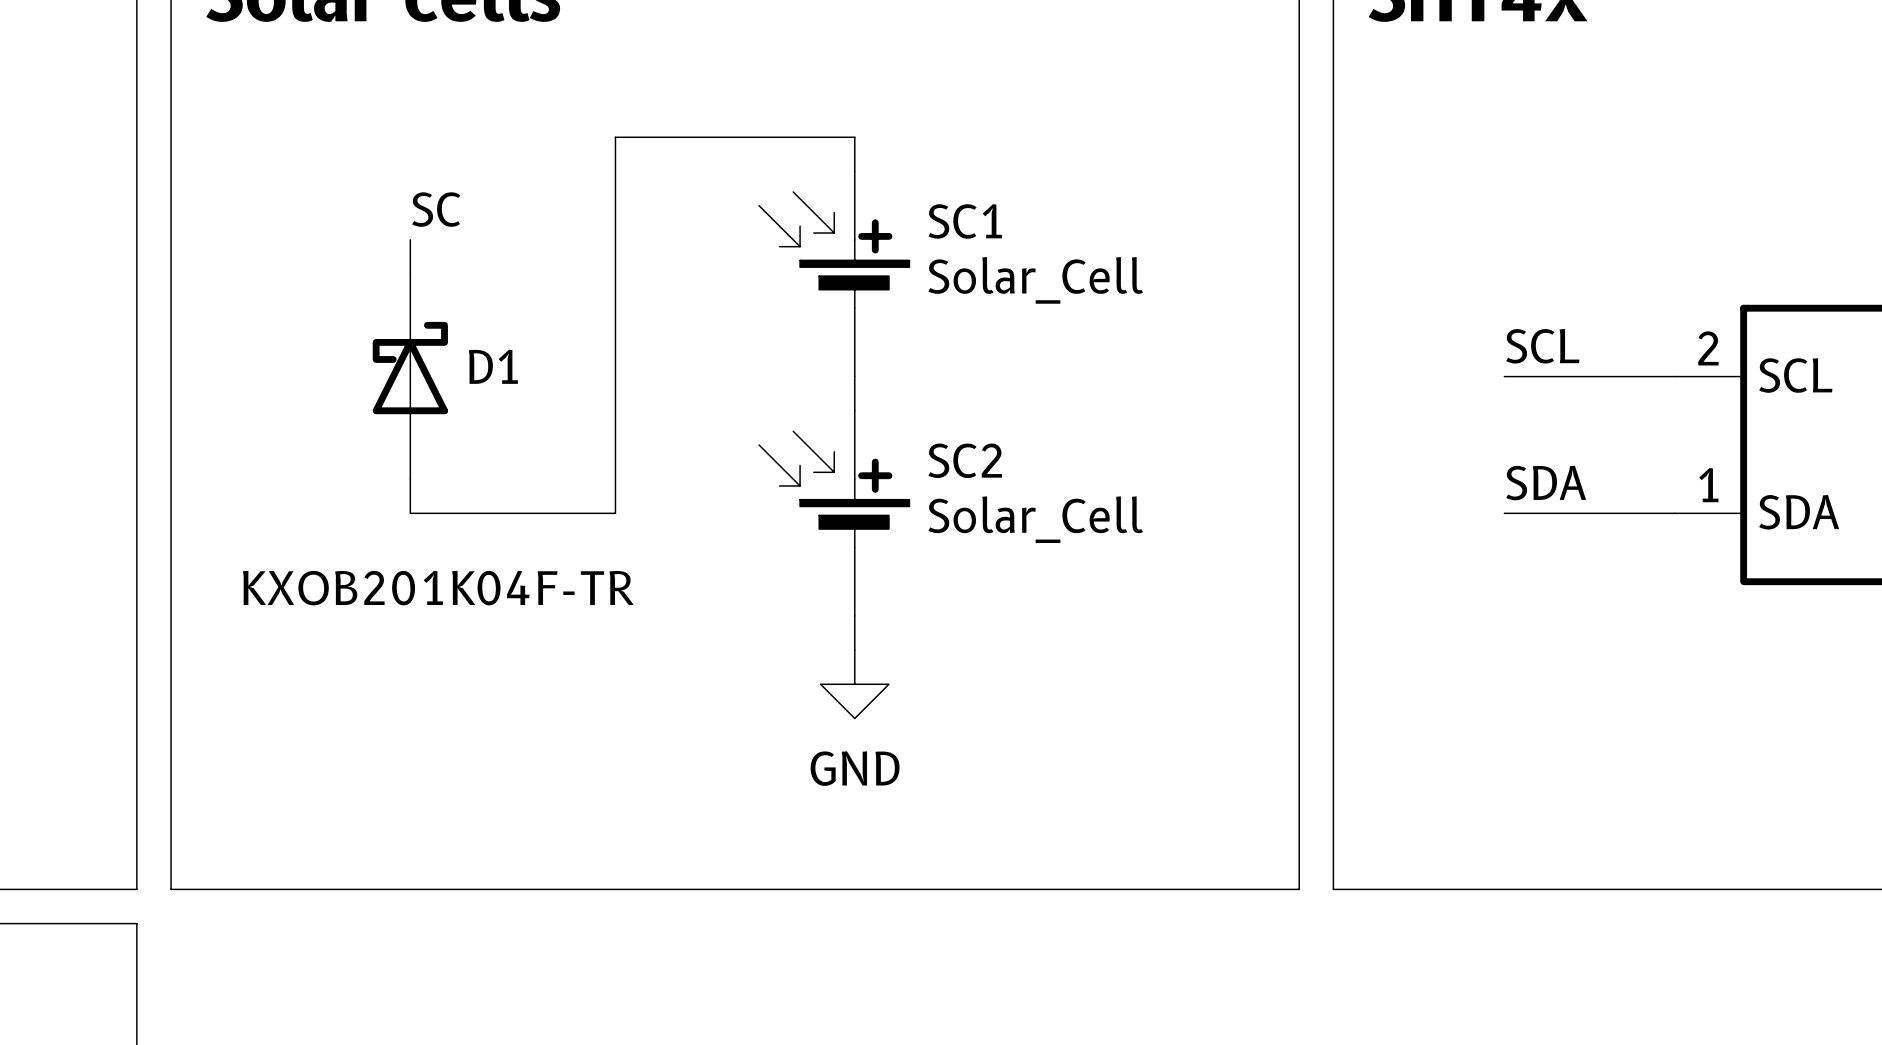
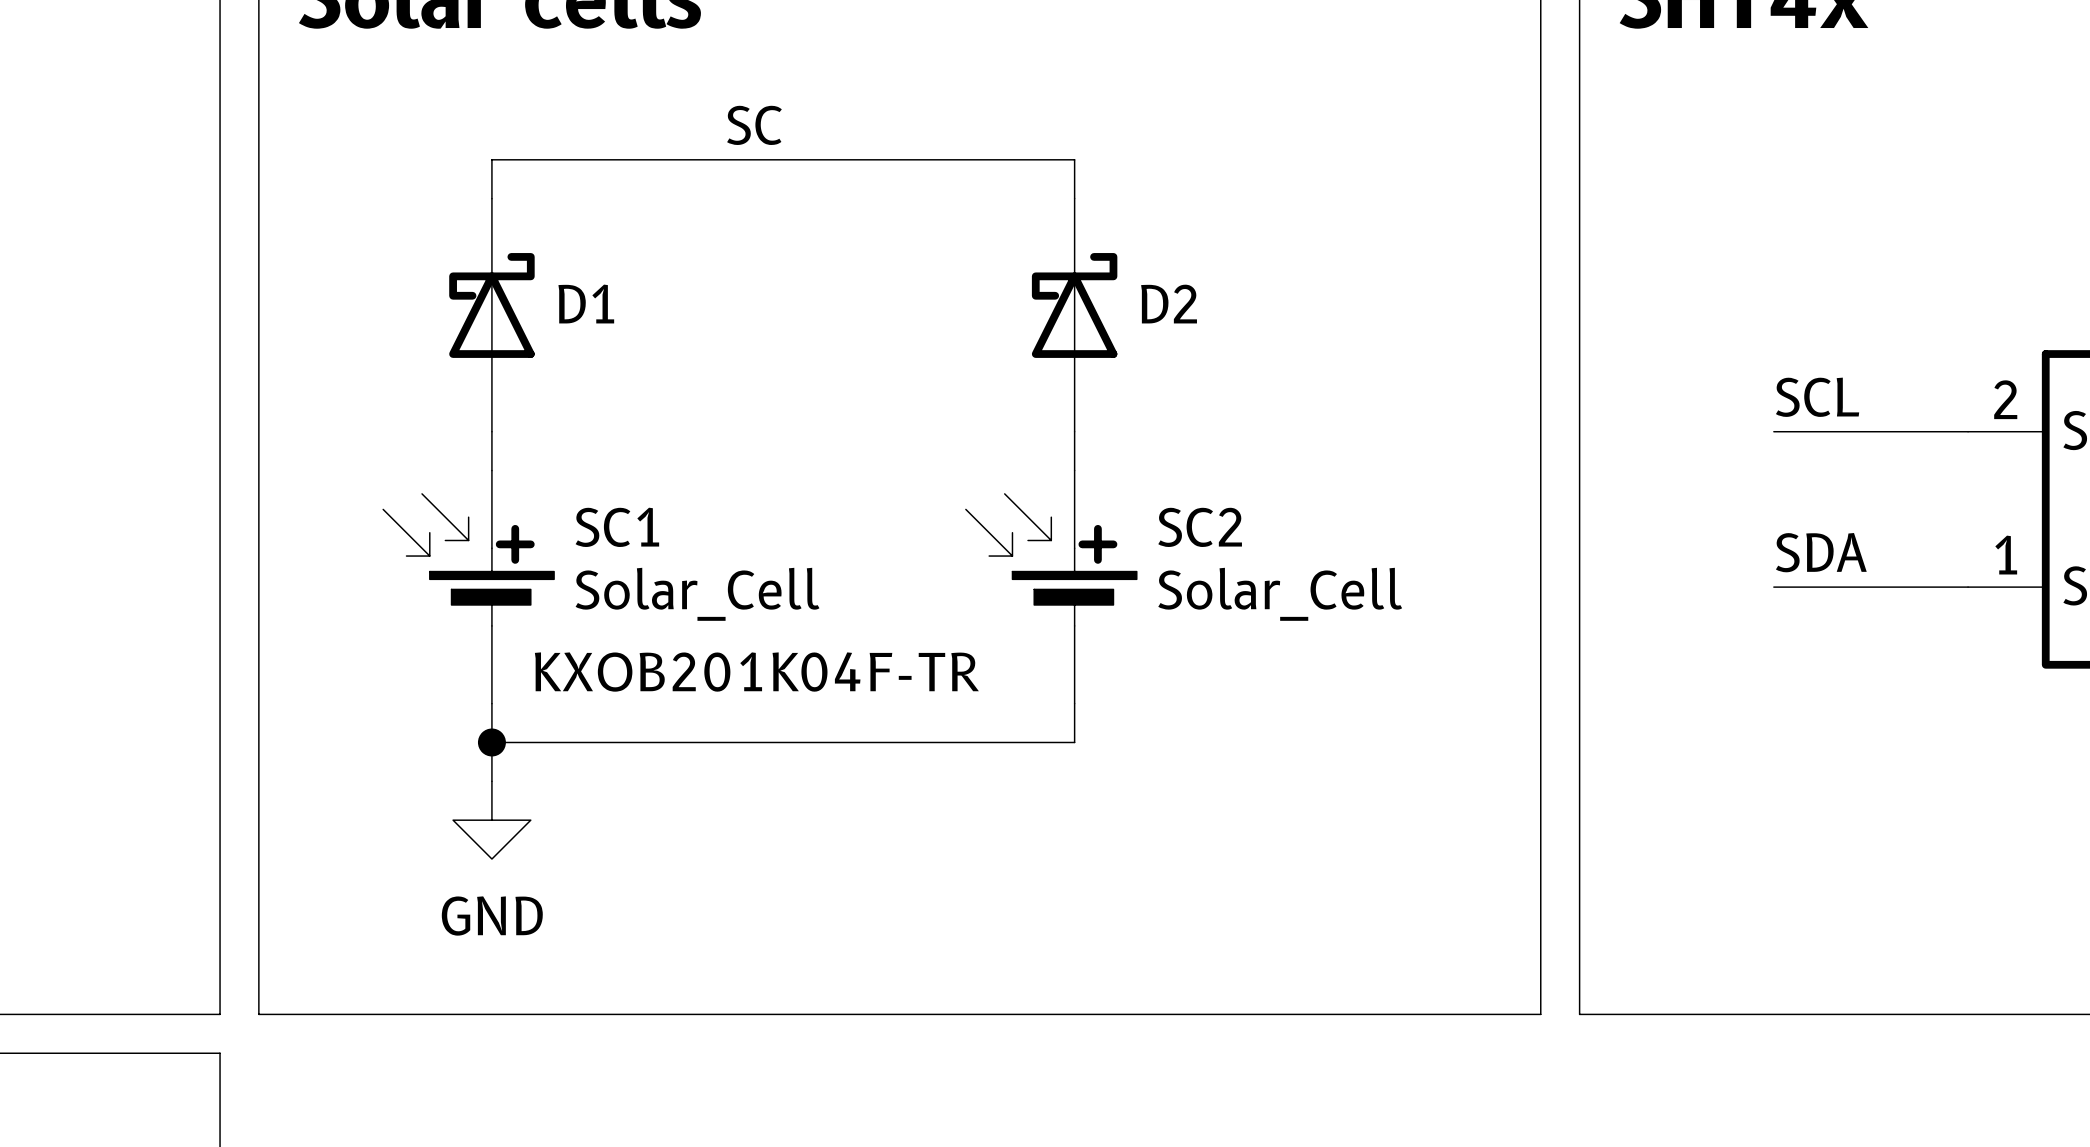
wire: (615, 137) (615, 513) (410, 513) (410, 479) -> (763, 159) (491, 159) (491, 198)
wire: (854, 137) (854, 171) -> (1035, 159) (1074, 159) (1074, 198)
label position: SC (436, 209) -> SC (754, 125)
wire: (410, 239) (410, 274) -> (491, 431) (491, 470)
SC1 position: (834, 274) -> (468, 587)
D2: none -> (1074, 315)
D1 position: (410, 376) -> (491, 315)
wire: (854, 376) (854, 410) -> (1074, 431) (1074, 470)
SC2 position: (834, 513) -> (1051, 587)
text position: KXOB201K04F-TR (438, 588) -> KXOB201K04F-TR (756, 672)
wire: none -> (491, 703) (491, 781)
wire: (854, 615) (854, 650) -> none
wire: none -> (1074, 703) (1074, 742) (491, 742)
junction: none -> (491, 742)
power symbol position: GND (854, 684) -> GND (491, 820)

